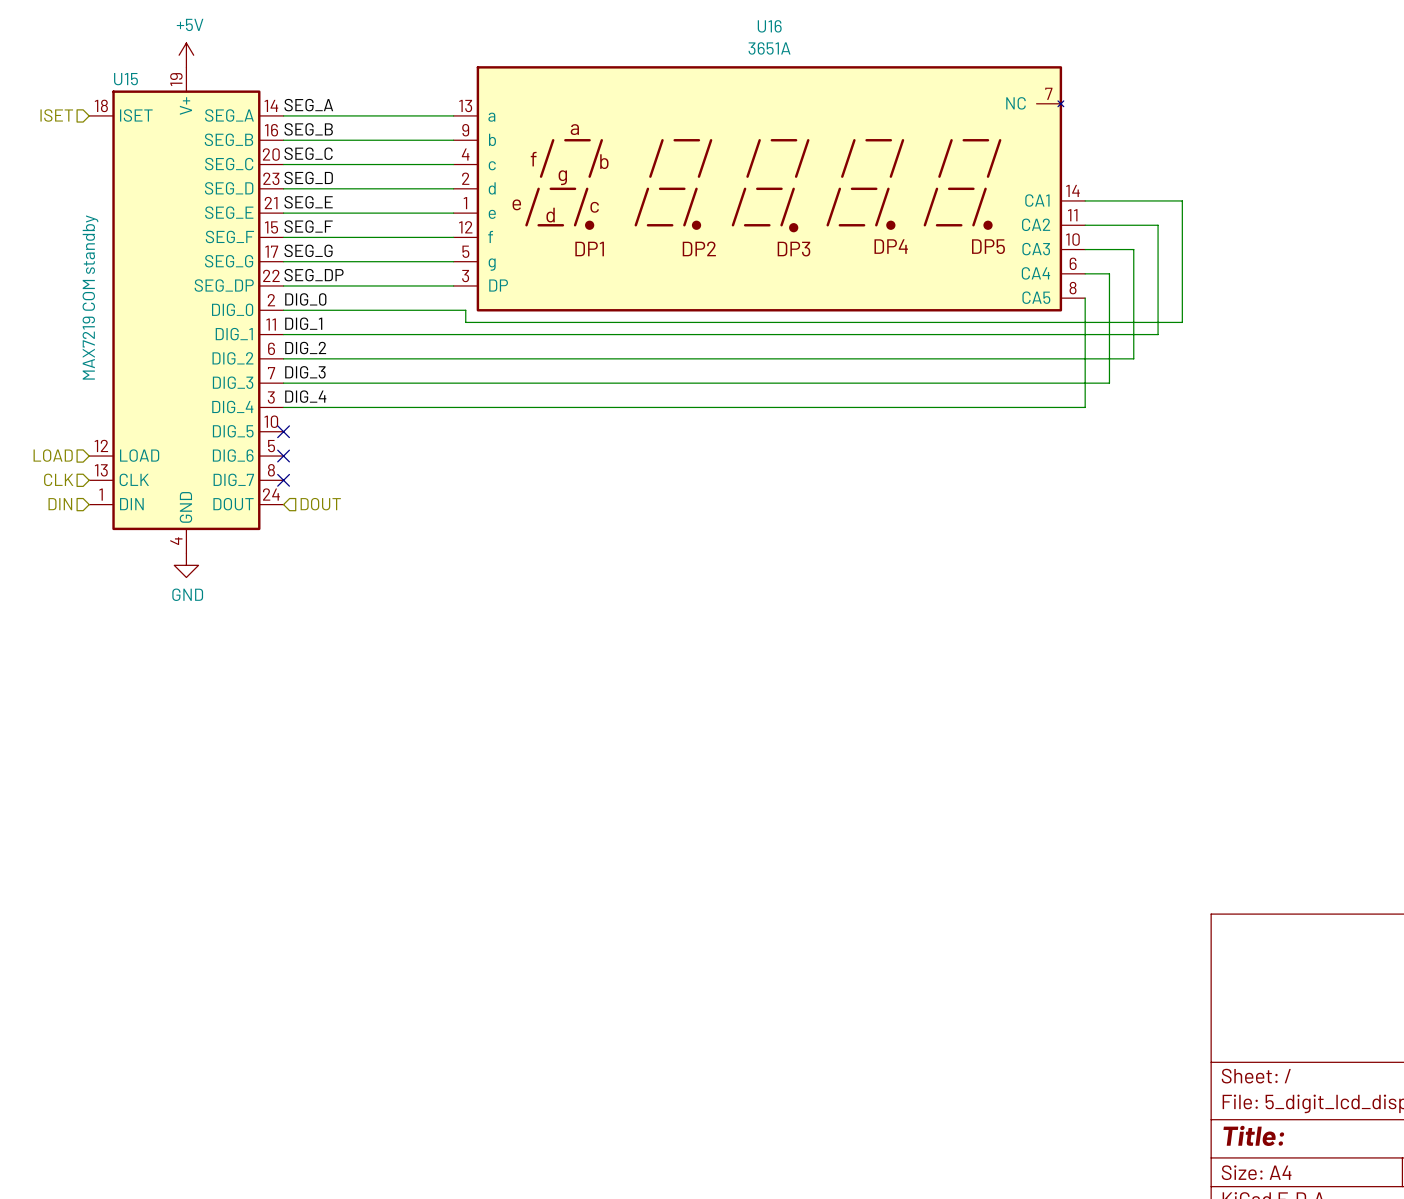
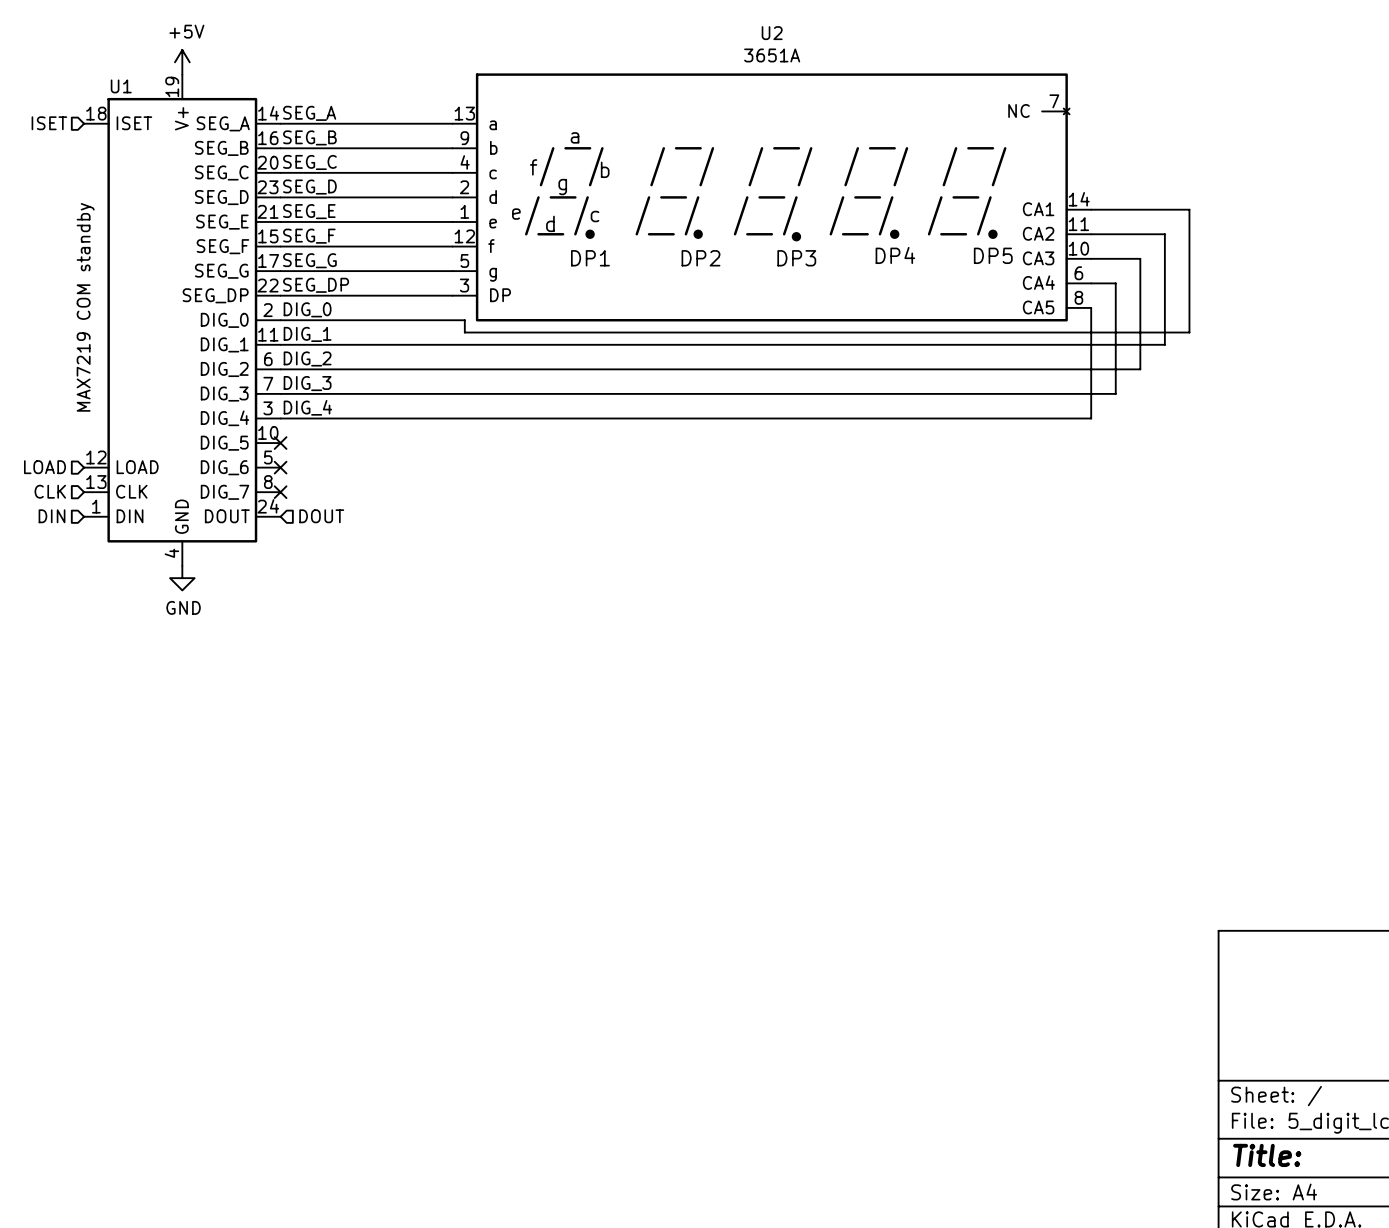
U16 name: U16 (769, 26) -> U2 (772, 33)
U15 name: U15 (125, 79) -> U1 (121, 86)

